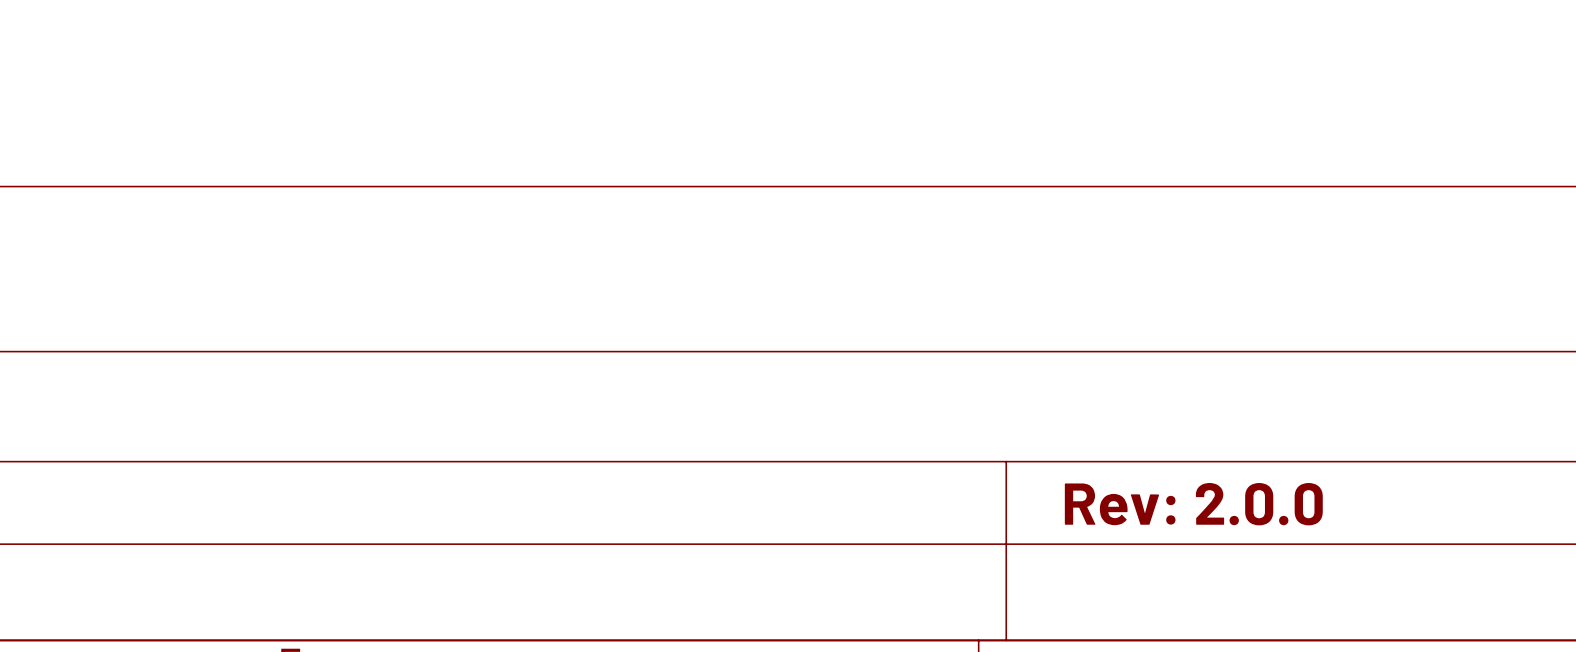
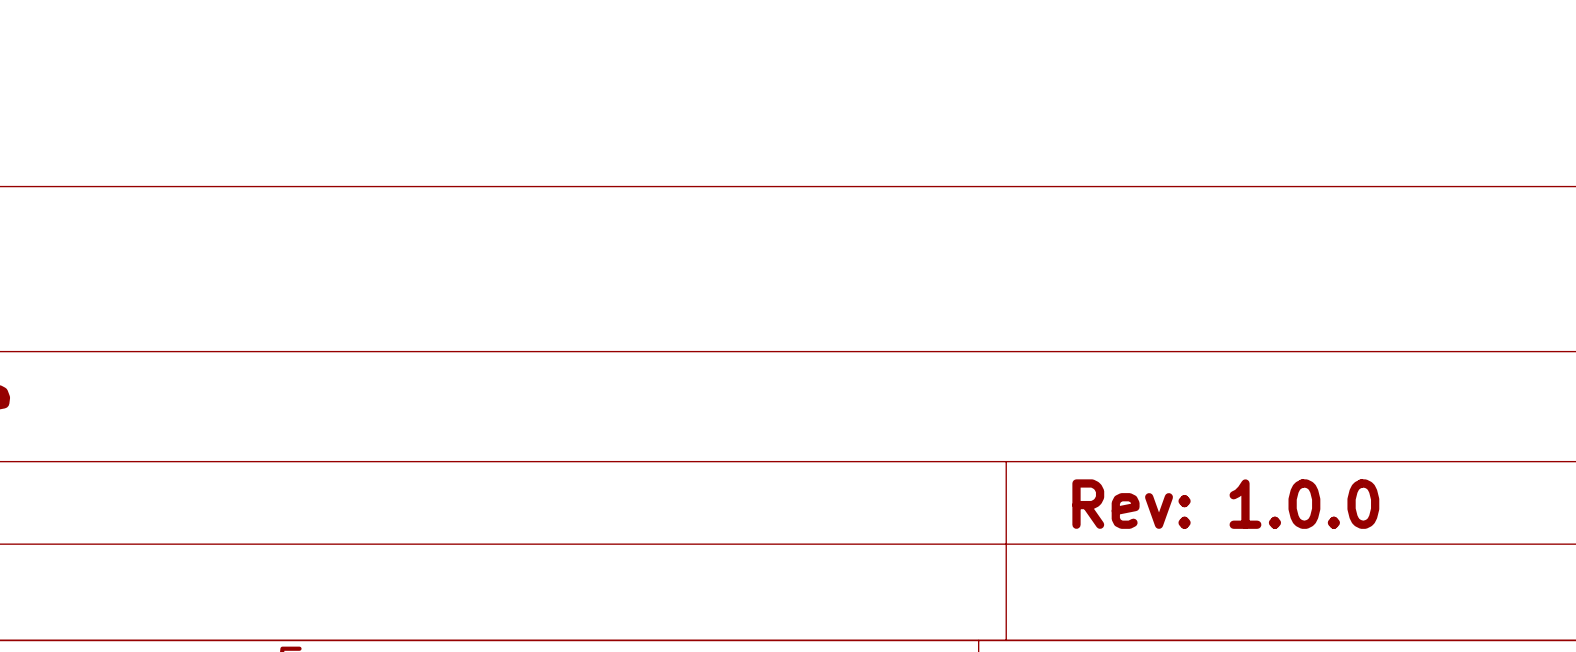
title block: Rev: 2.0.0 (1193, 504) -> Rev: 1.0.0 (1225, 504)

